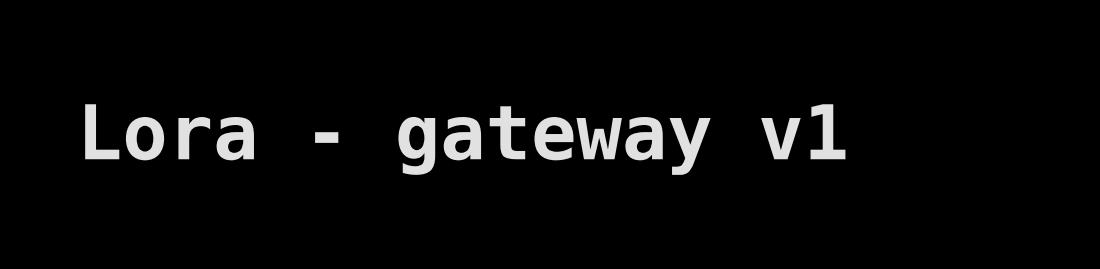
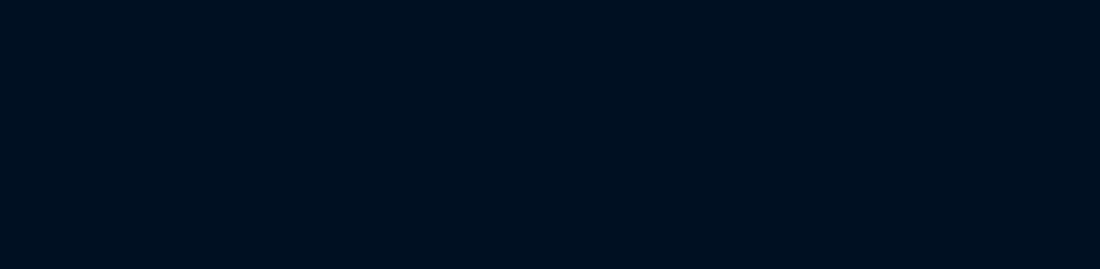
text: Lora - gateway v1 (465, 139) -> none

